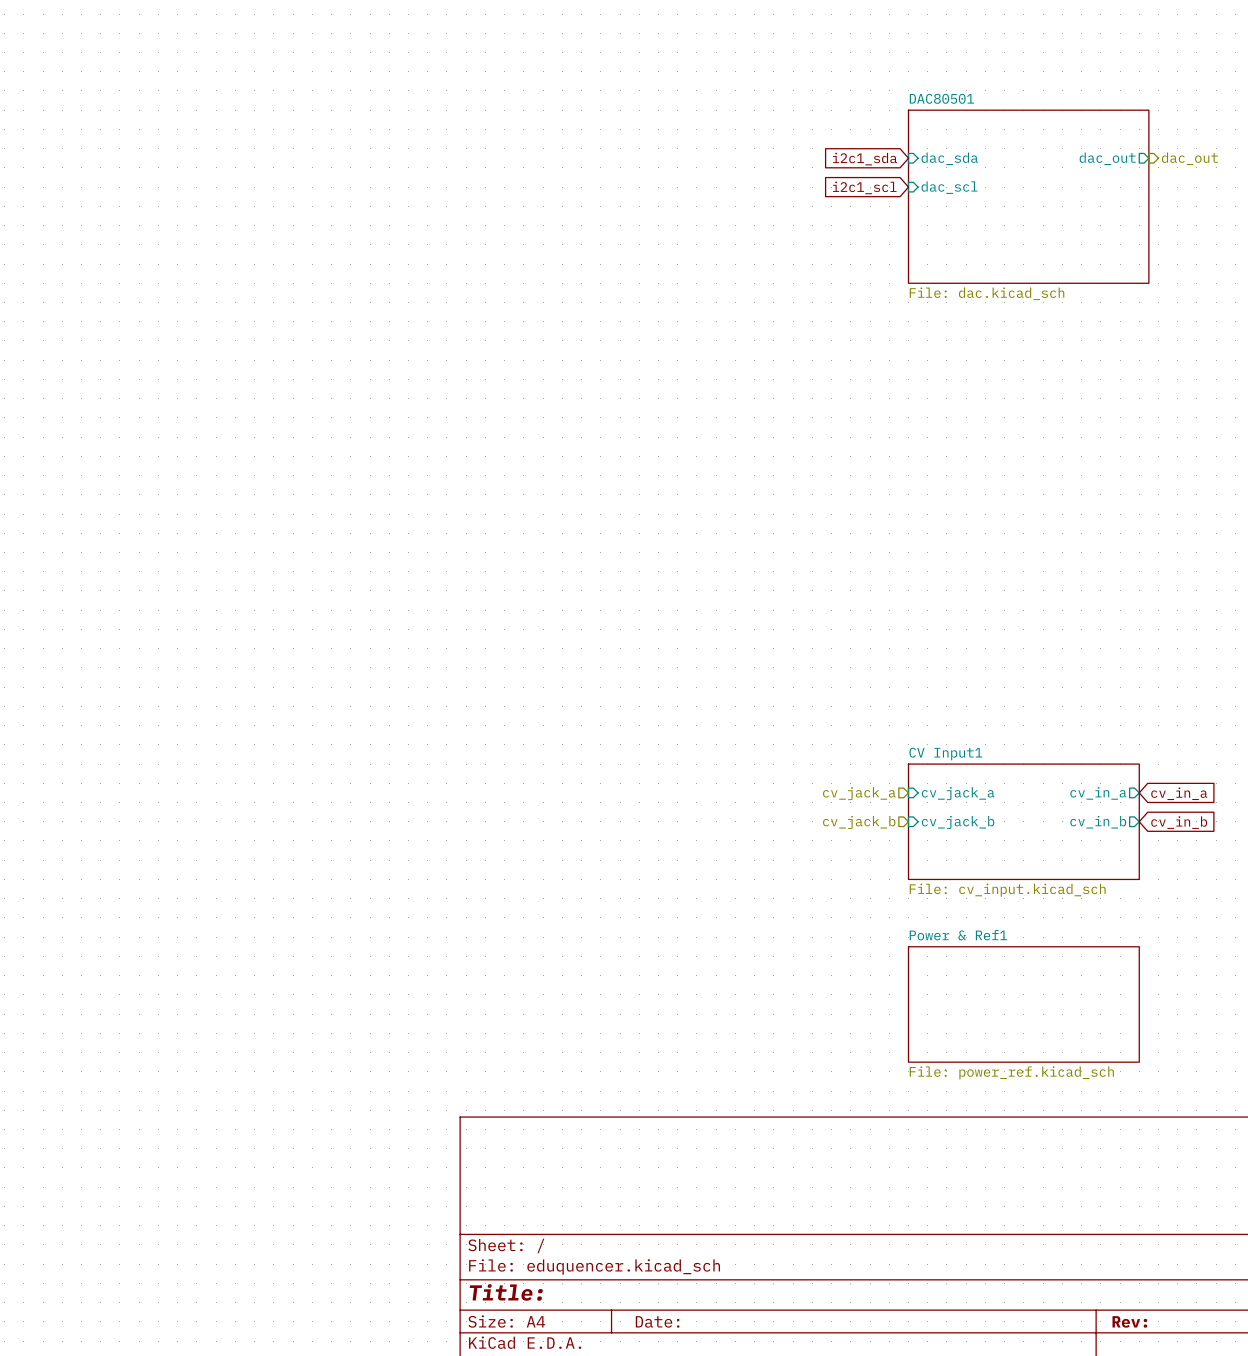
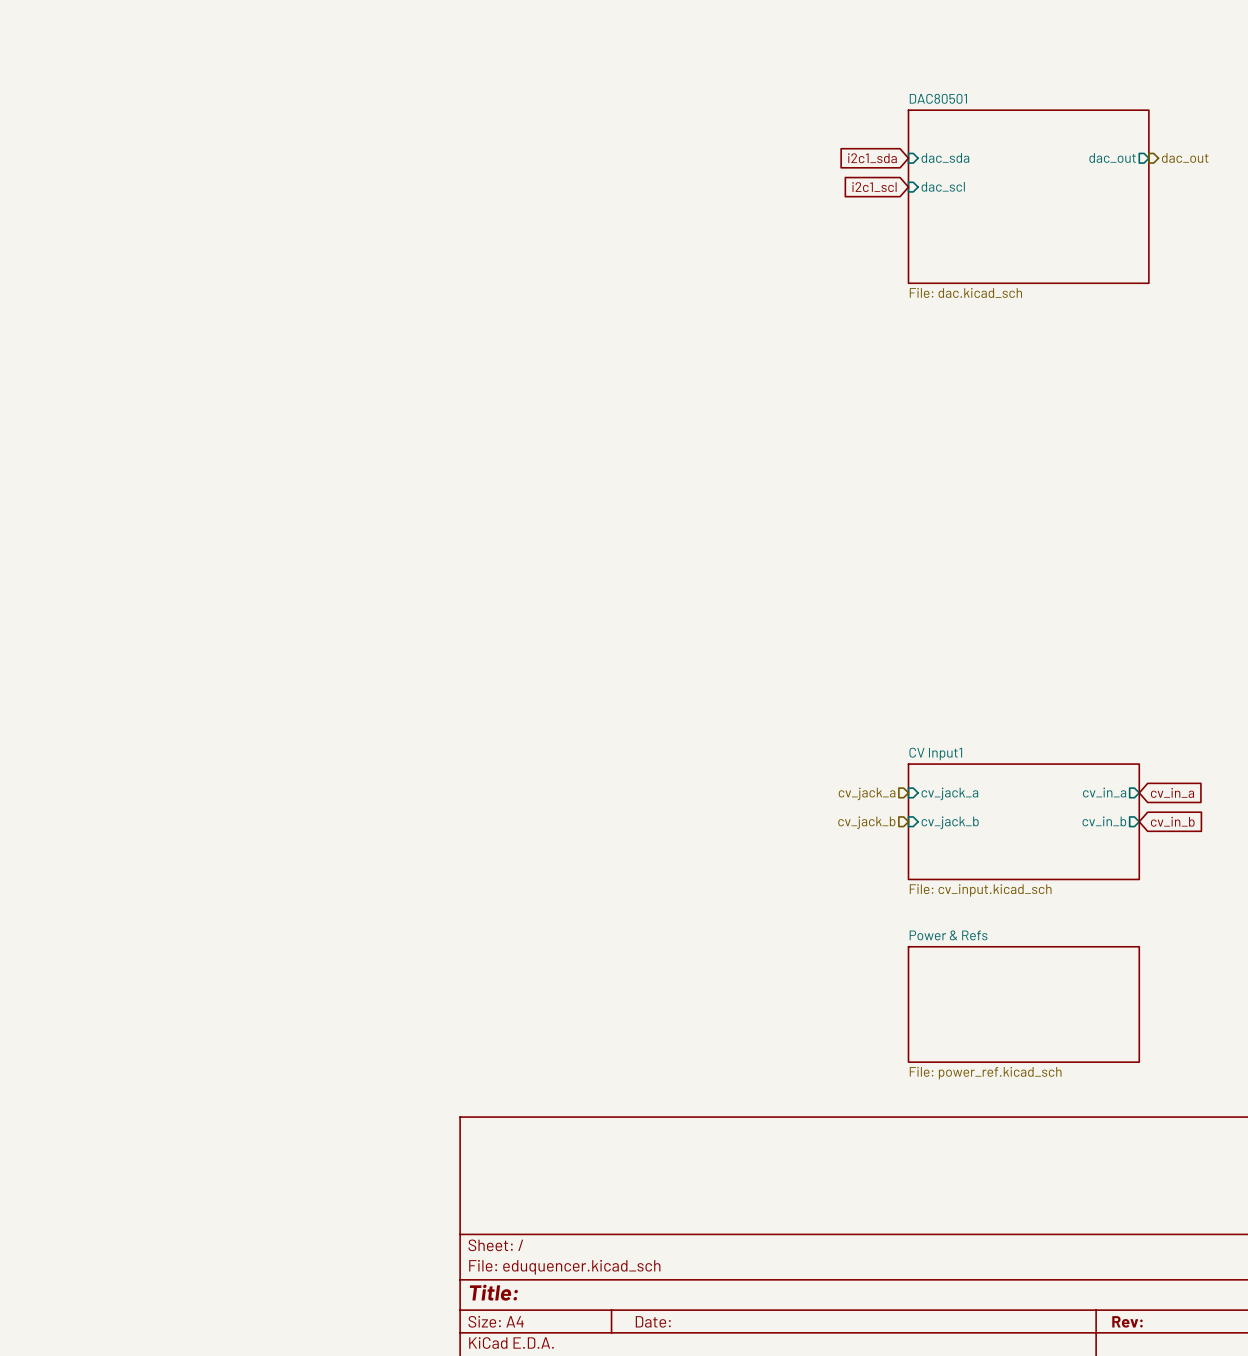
sheet Power & Ref1 name: Power & Ref1 (958, 935) -> Power & Refs (948, 935)

